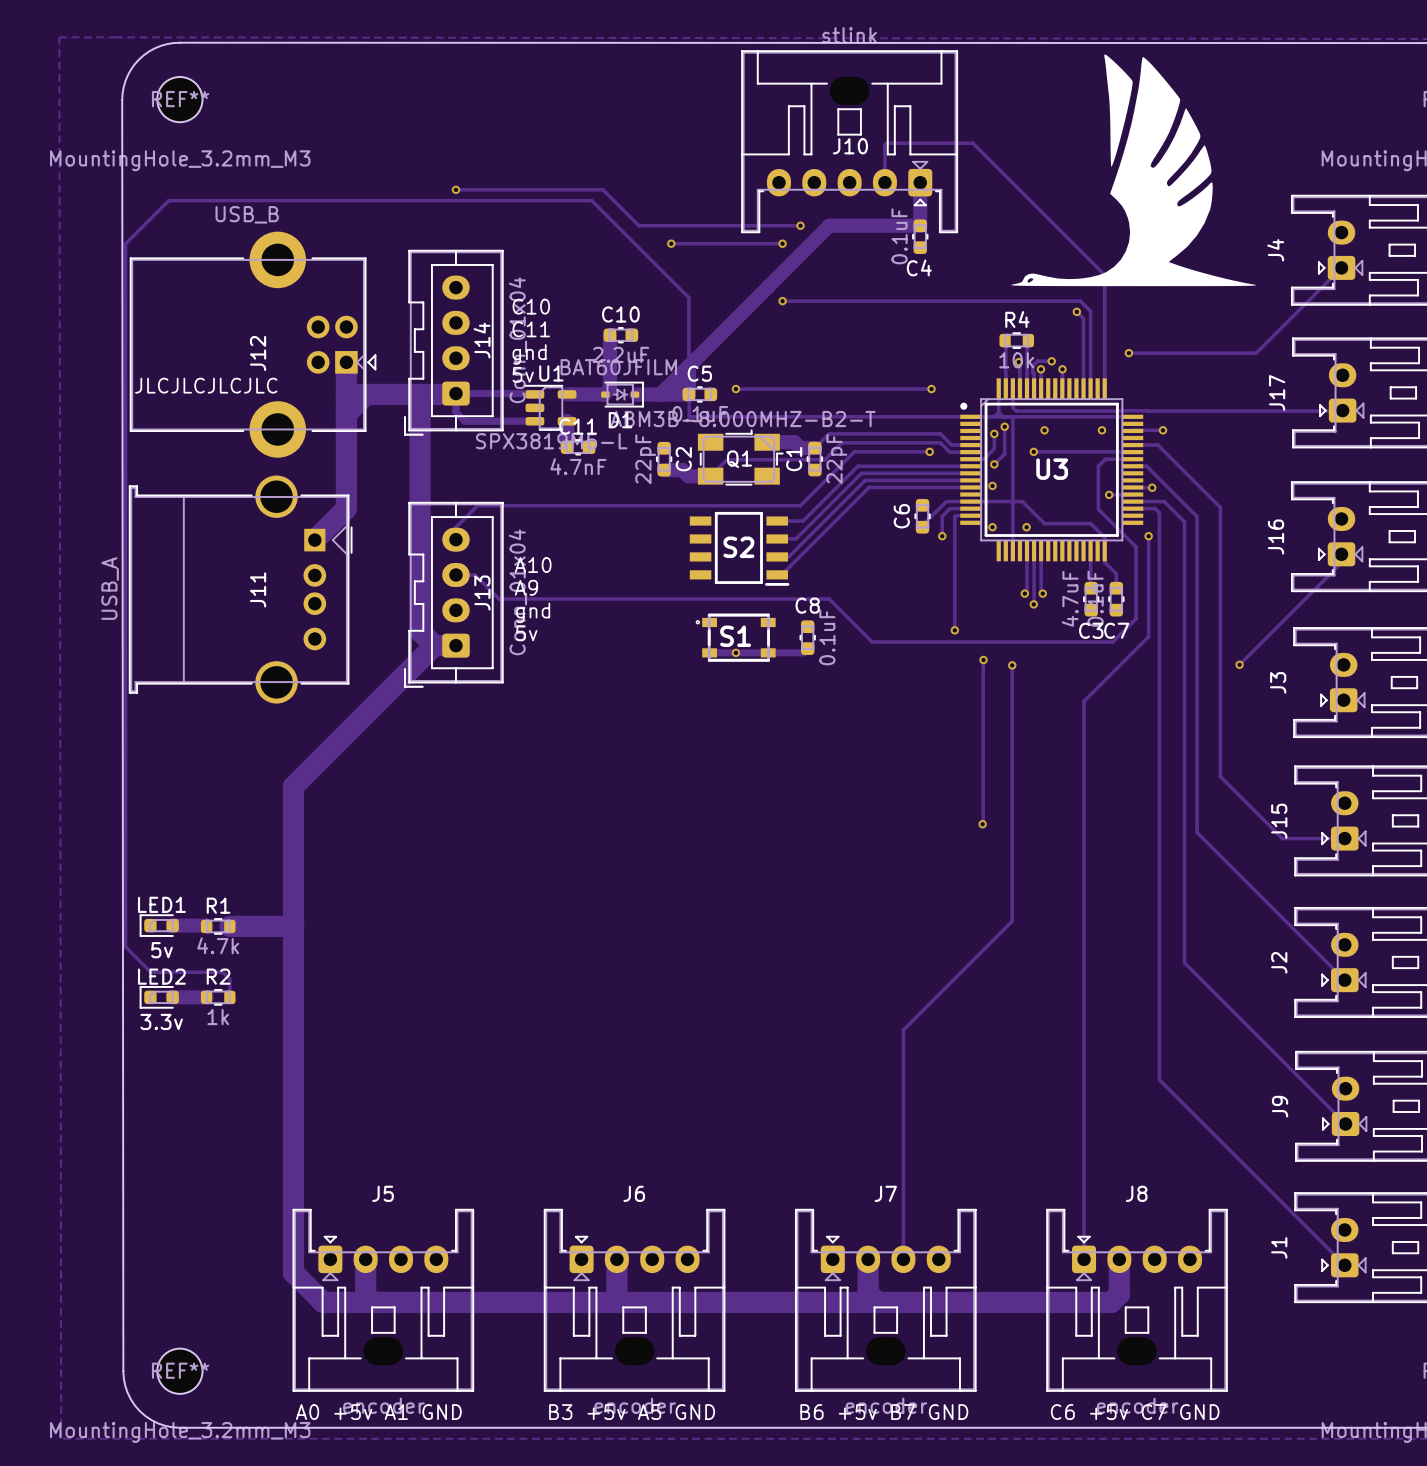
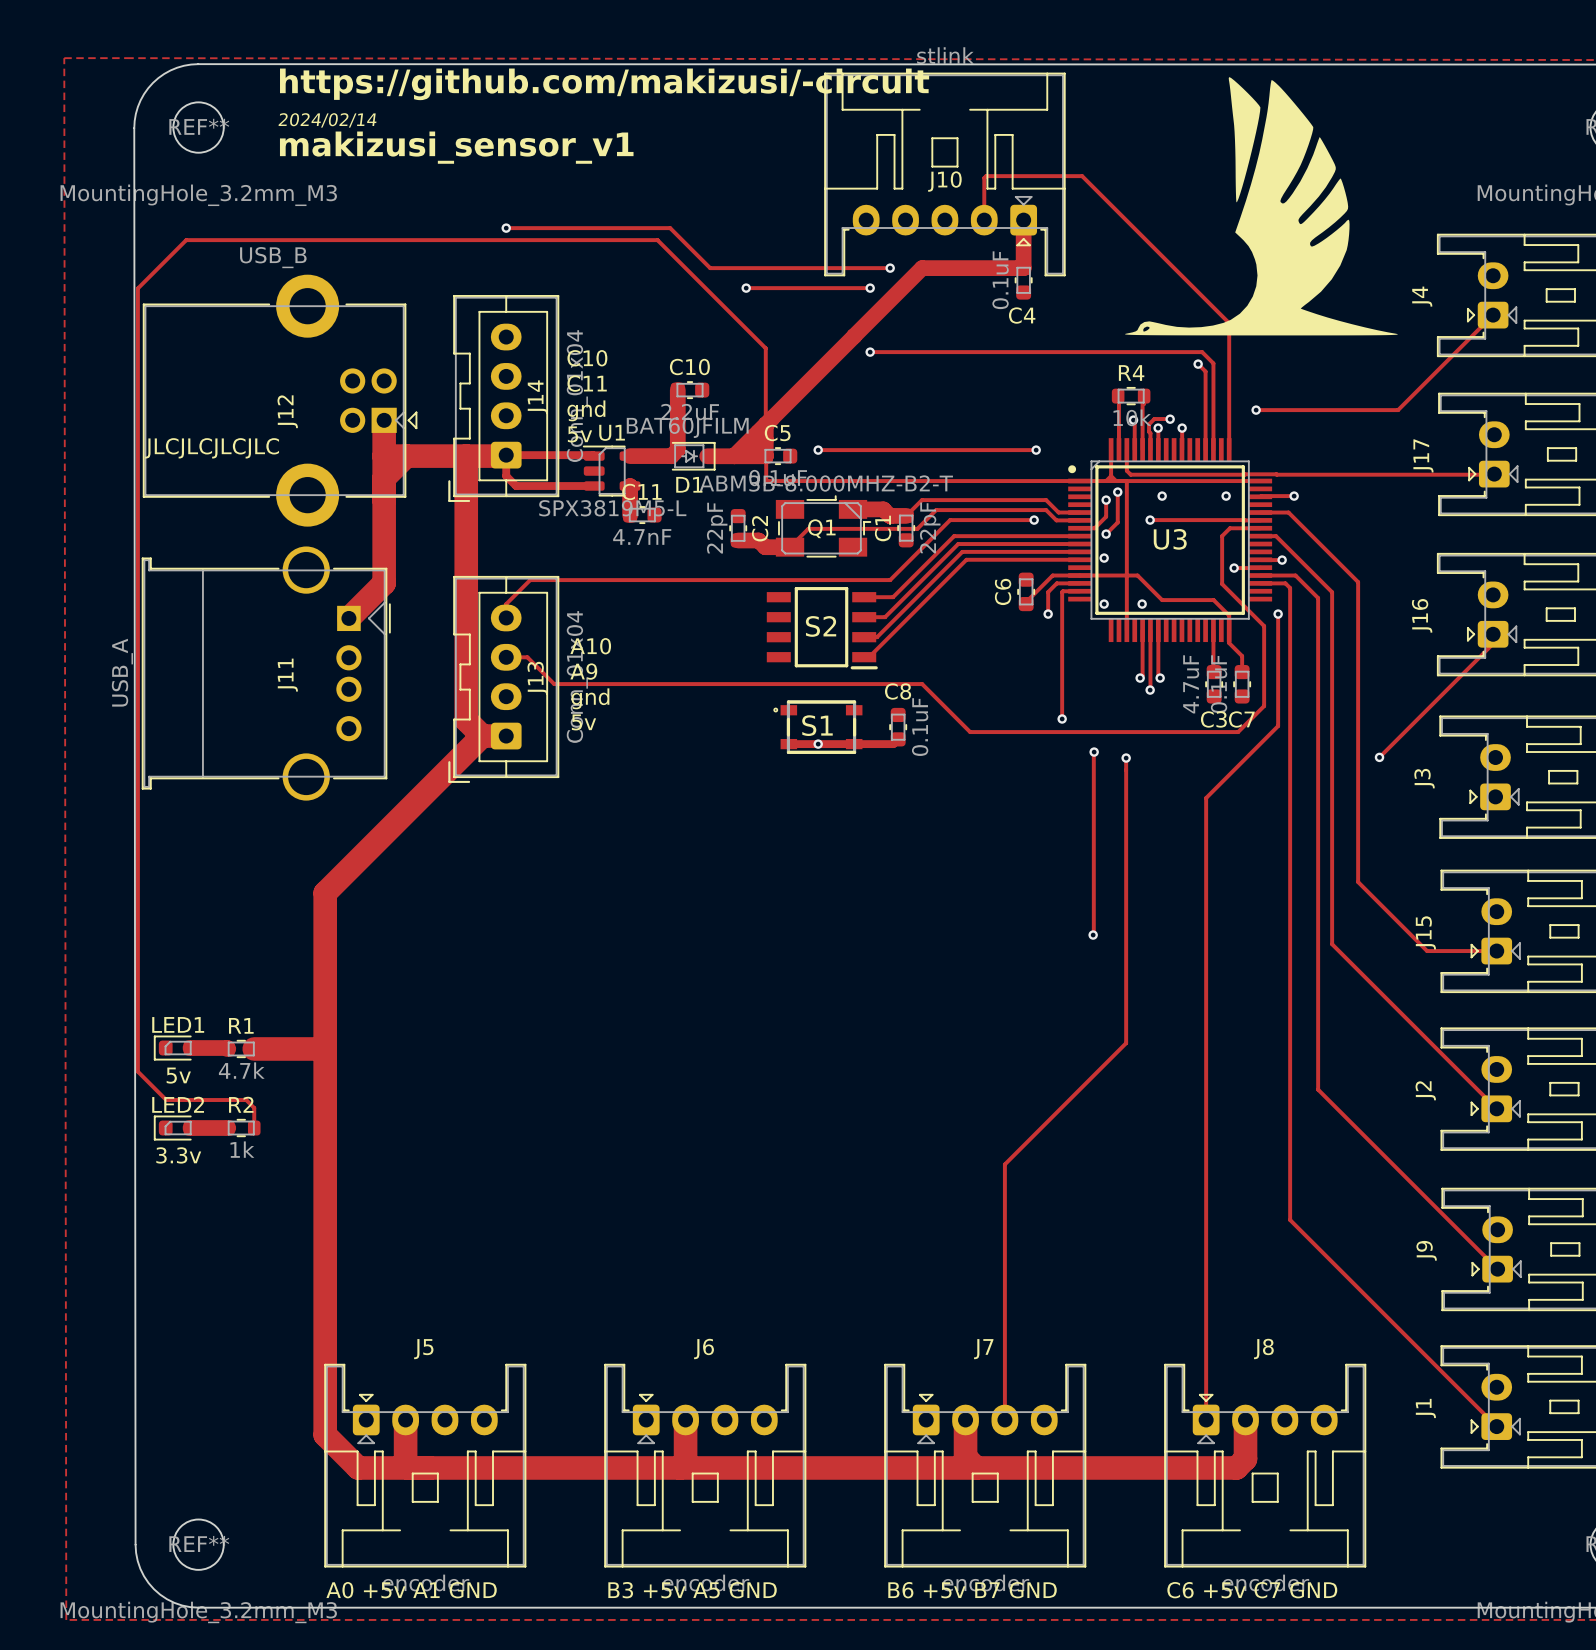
text: none -> https://github.com/makizusi/-circuit (604, 84)
text: none -> 2024/02/14 (327, 120)
text: none -> makizusi_sensor_v1 (456, 147)

